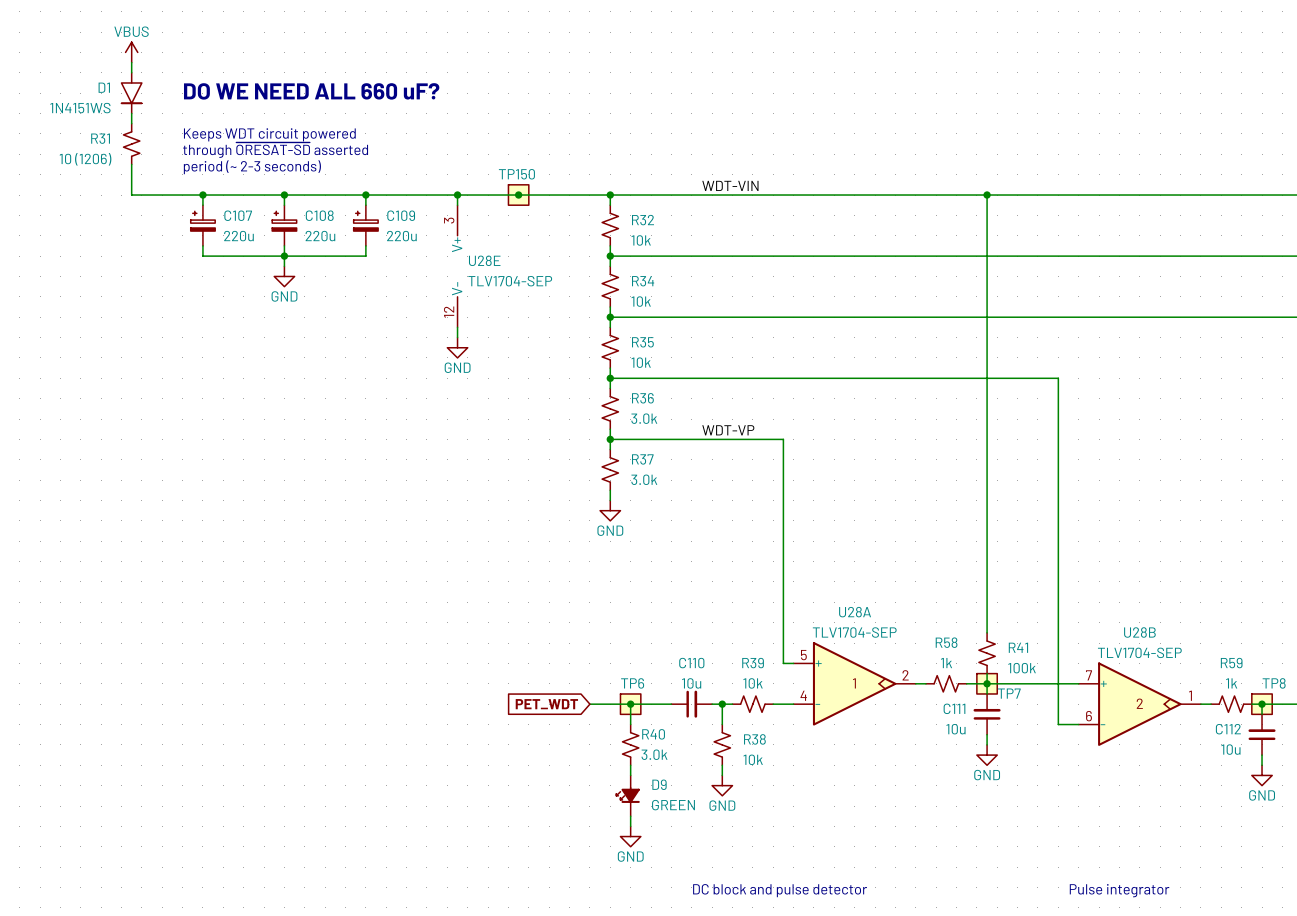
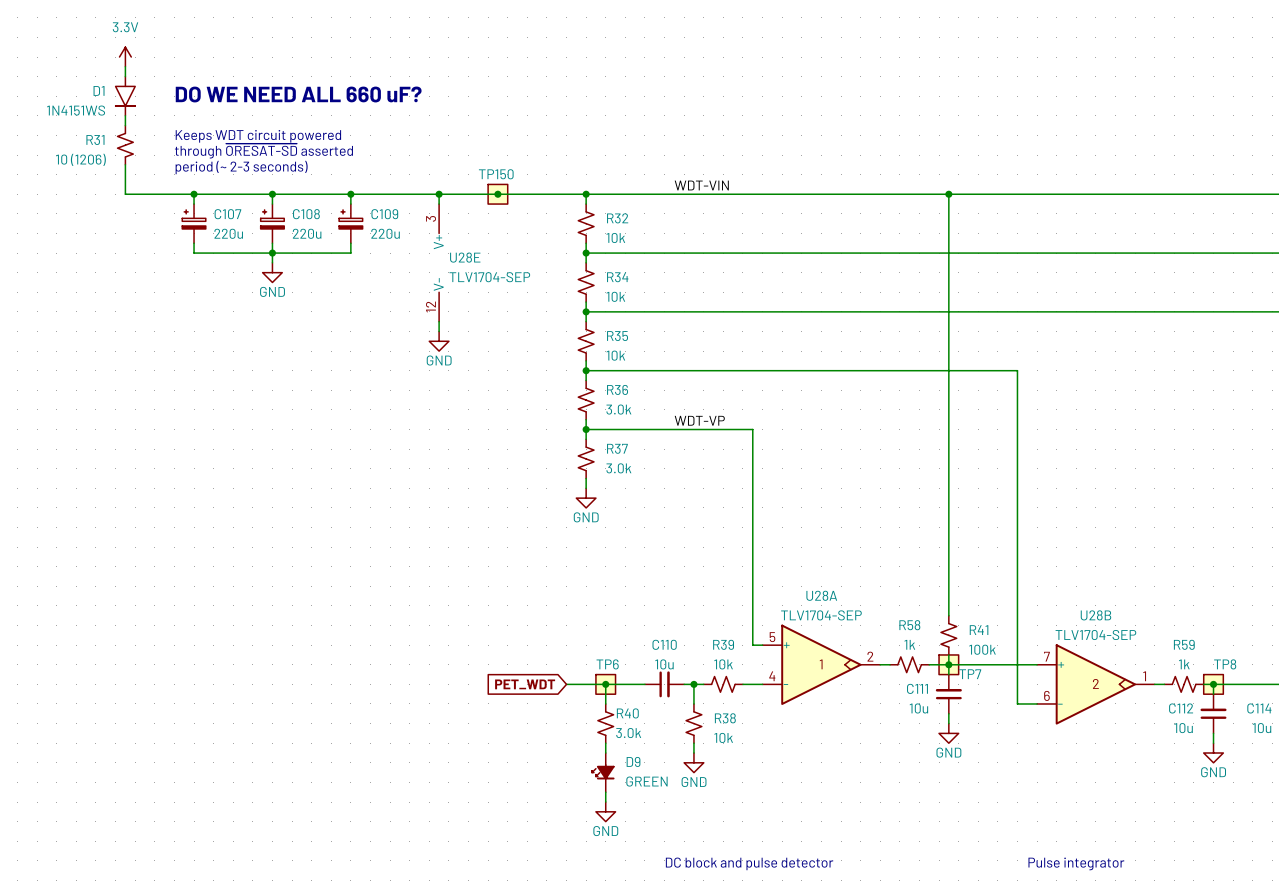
power symbol: VBUS (131, 52) -> 3.3V (125, 57)

